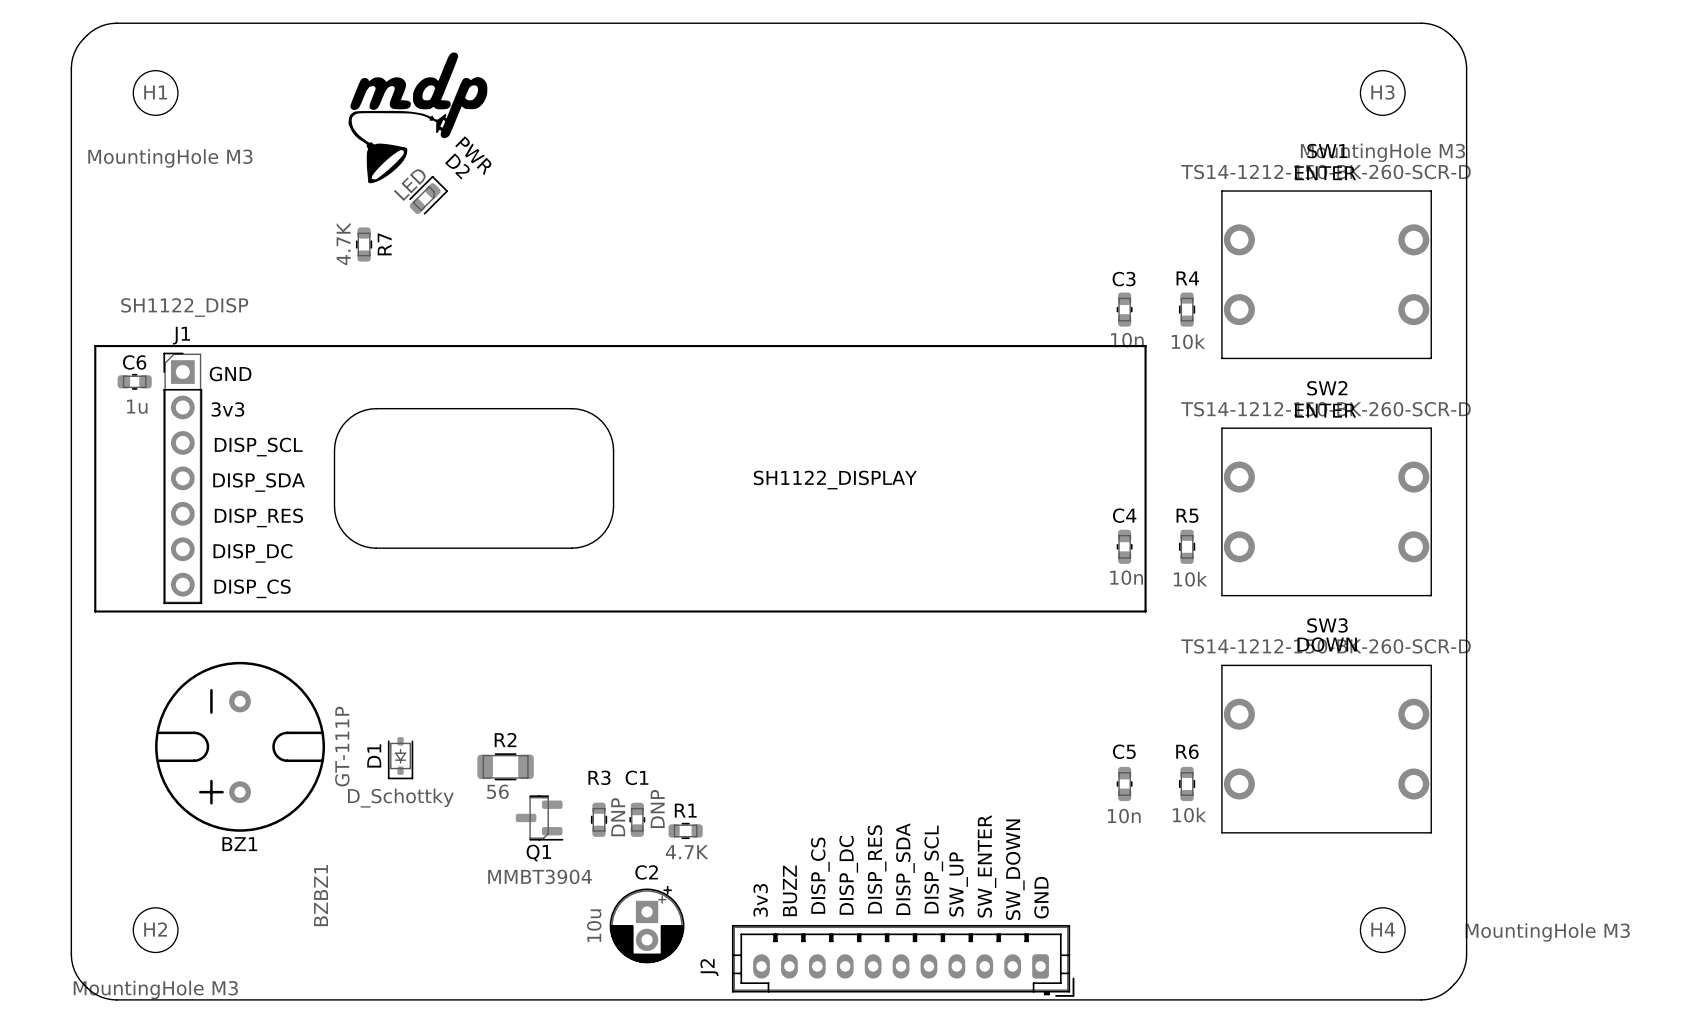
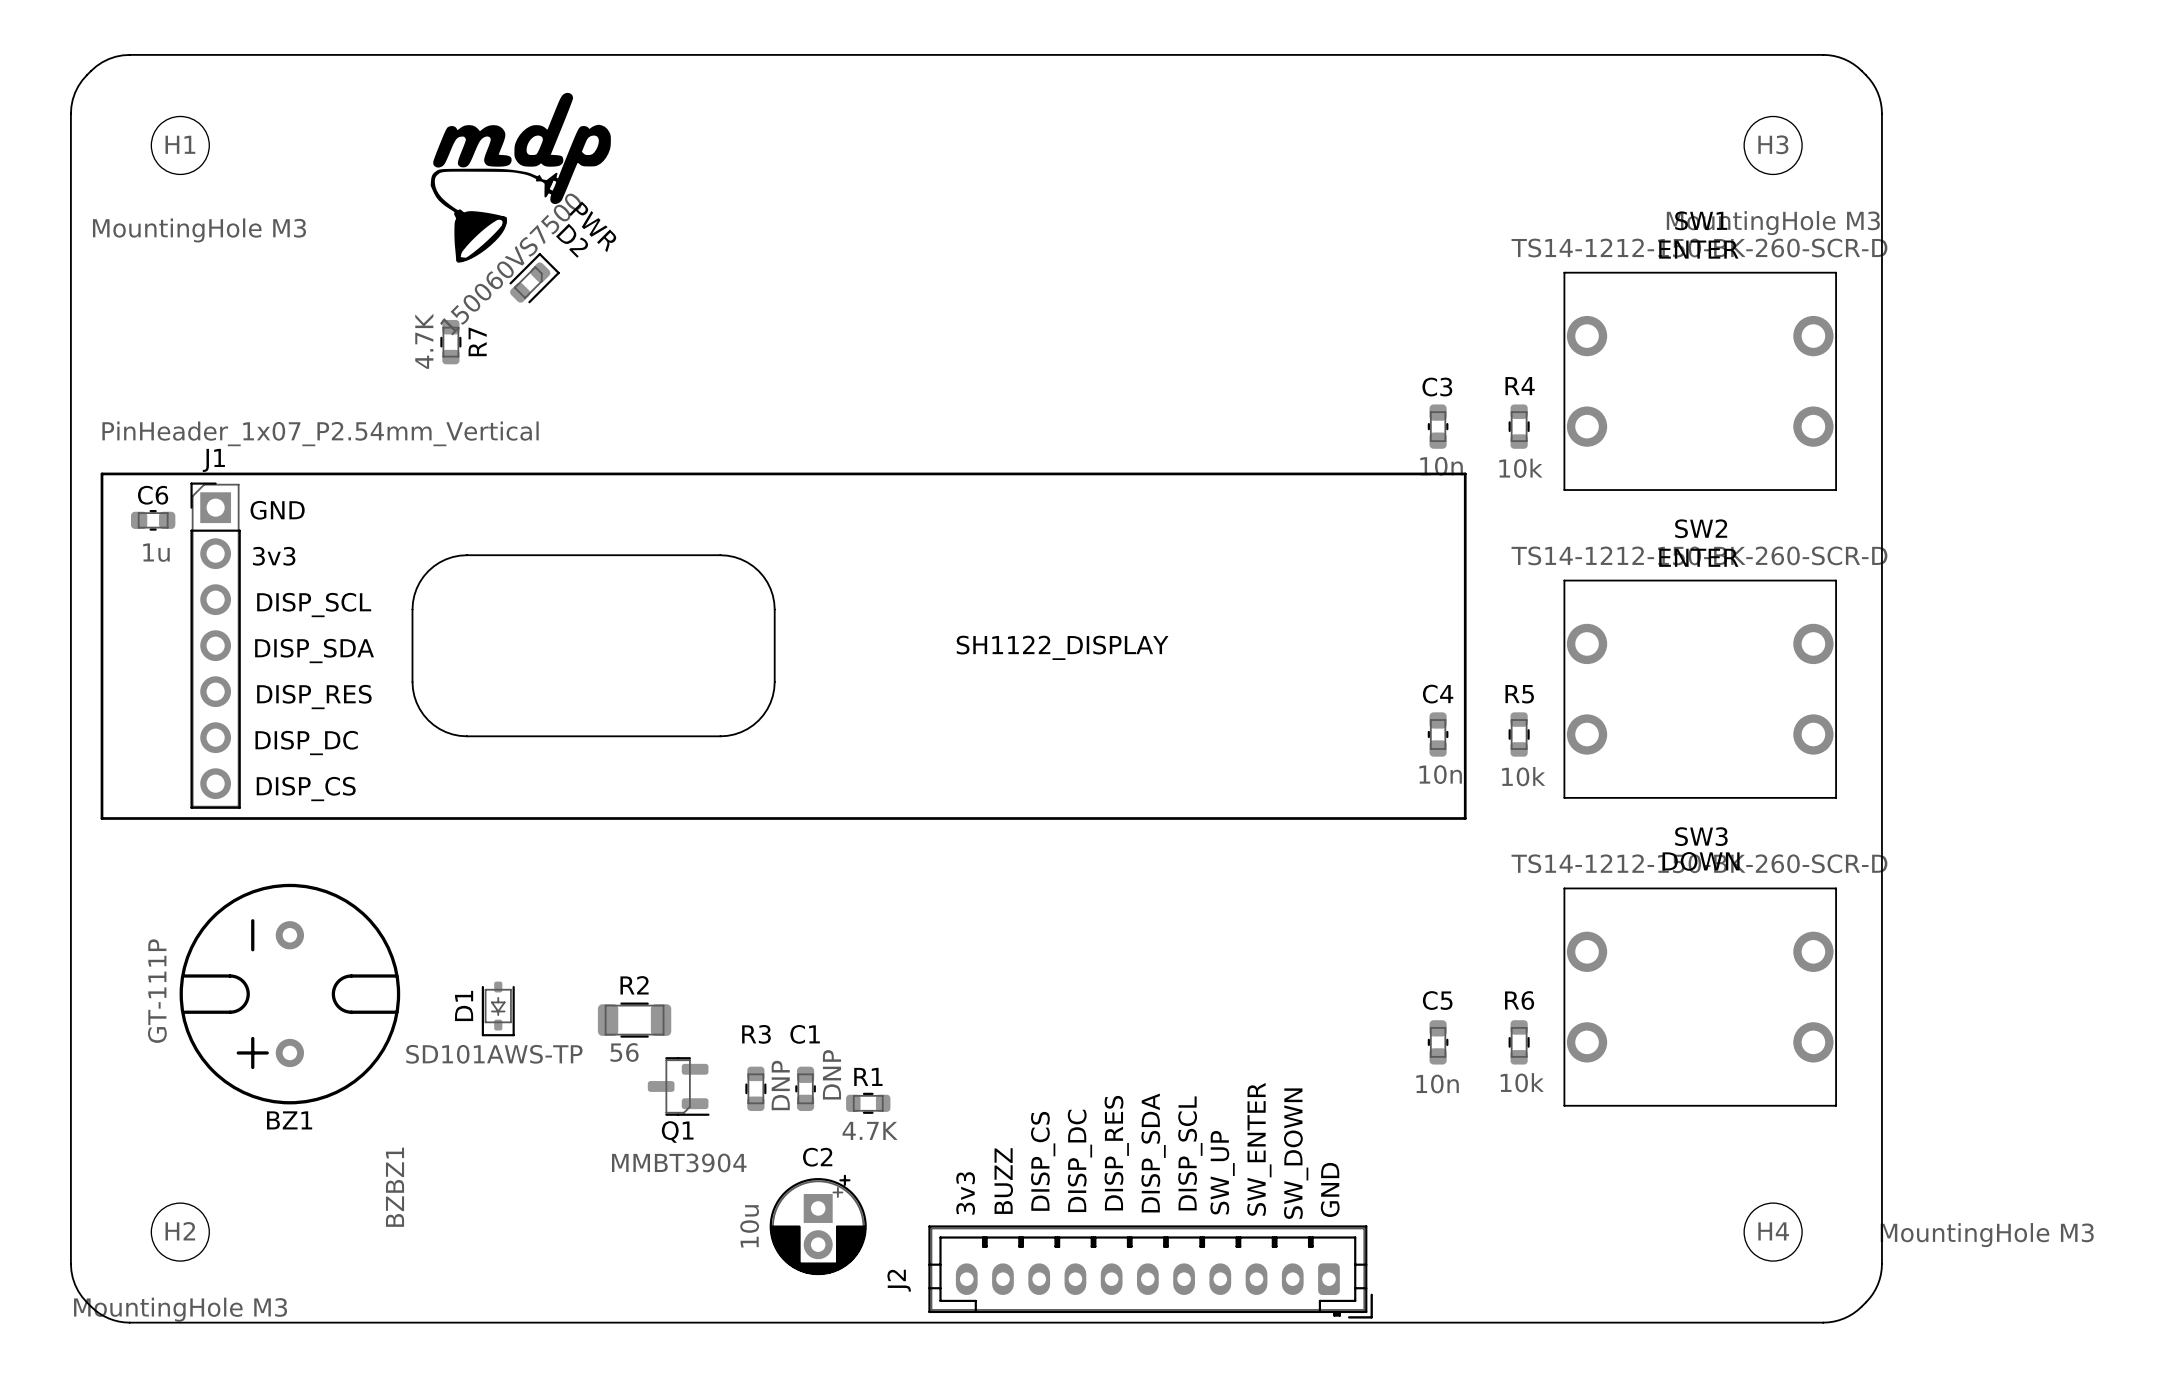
D2 value: LED (409, 185) -> 150060VS7500 (511, 264)
J1 value: SH1122_DISP (184, 307) -> PinHeader_1x07_P2.54mm_Vertical (320, 433)
BZ1 value position: GT-111P (342, 746) -> GT-111P (157, 991)
D1 value: D_Schottky (400, 798) -> SD101AWS-TP (494, 1054)

